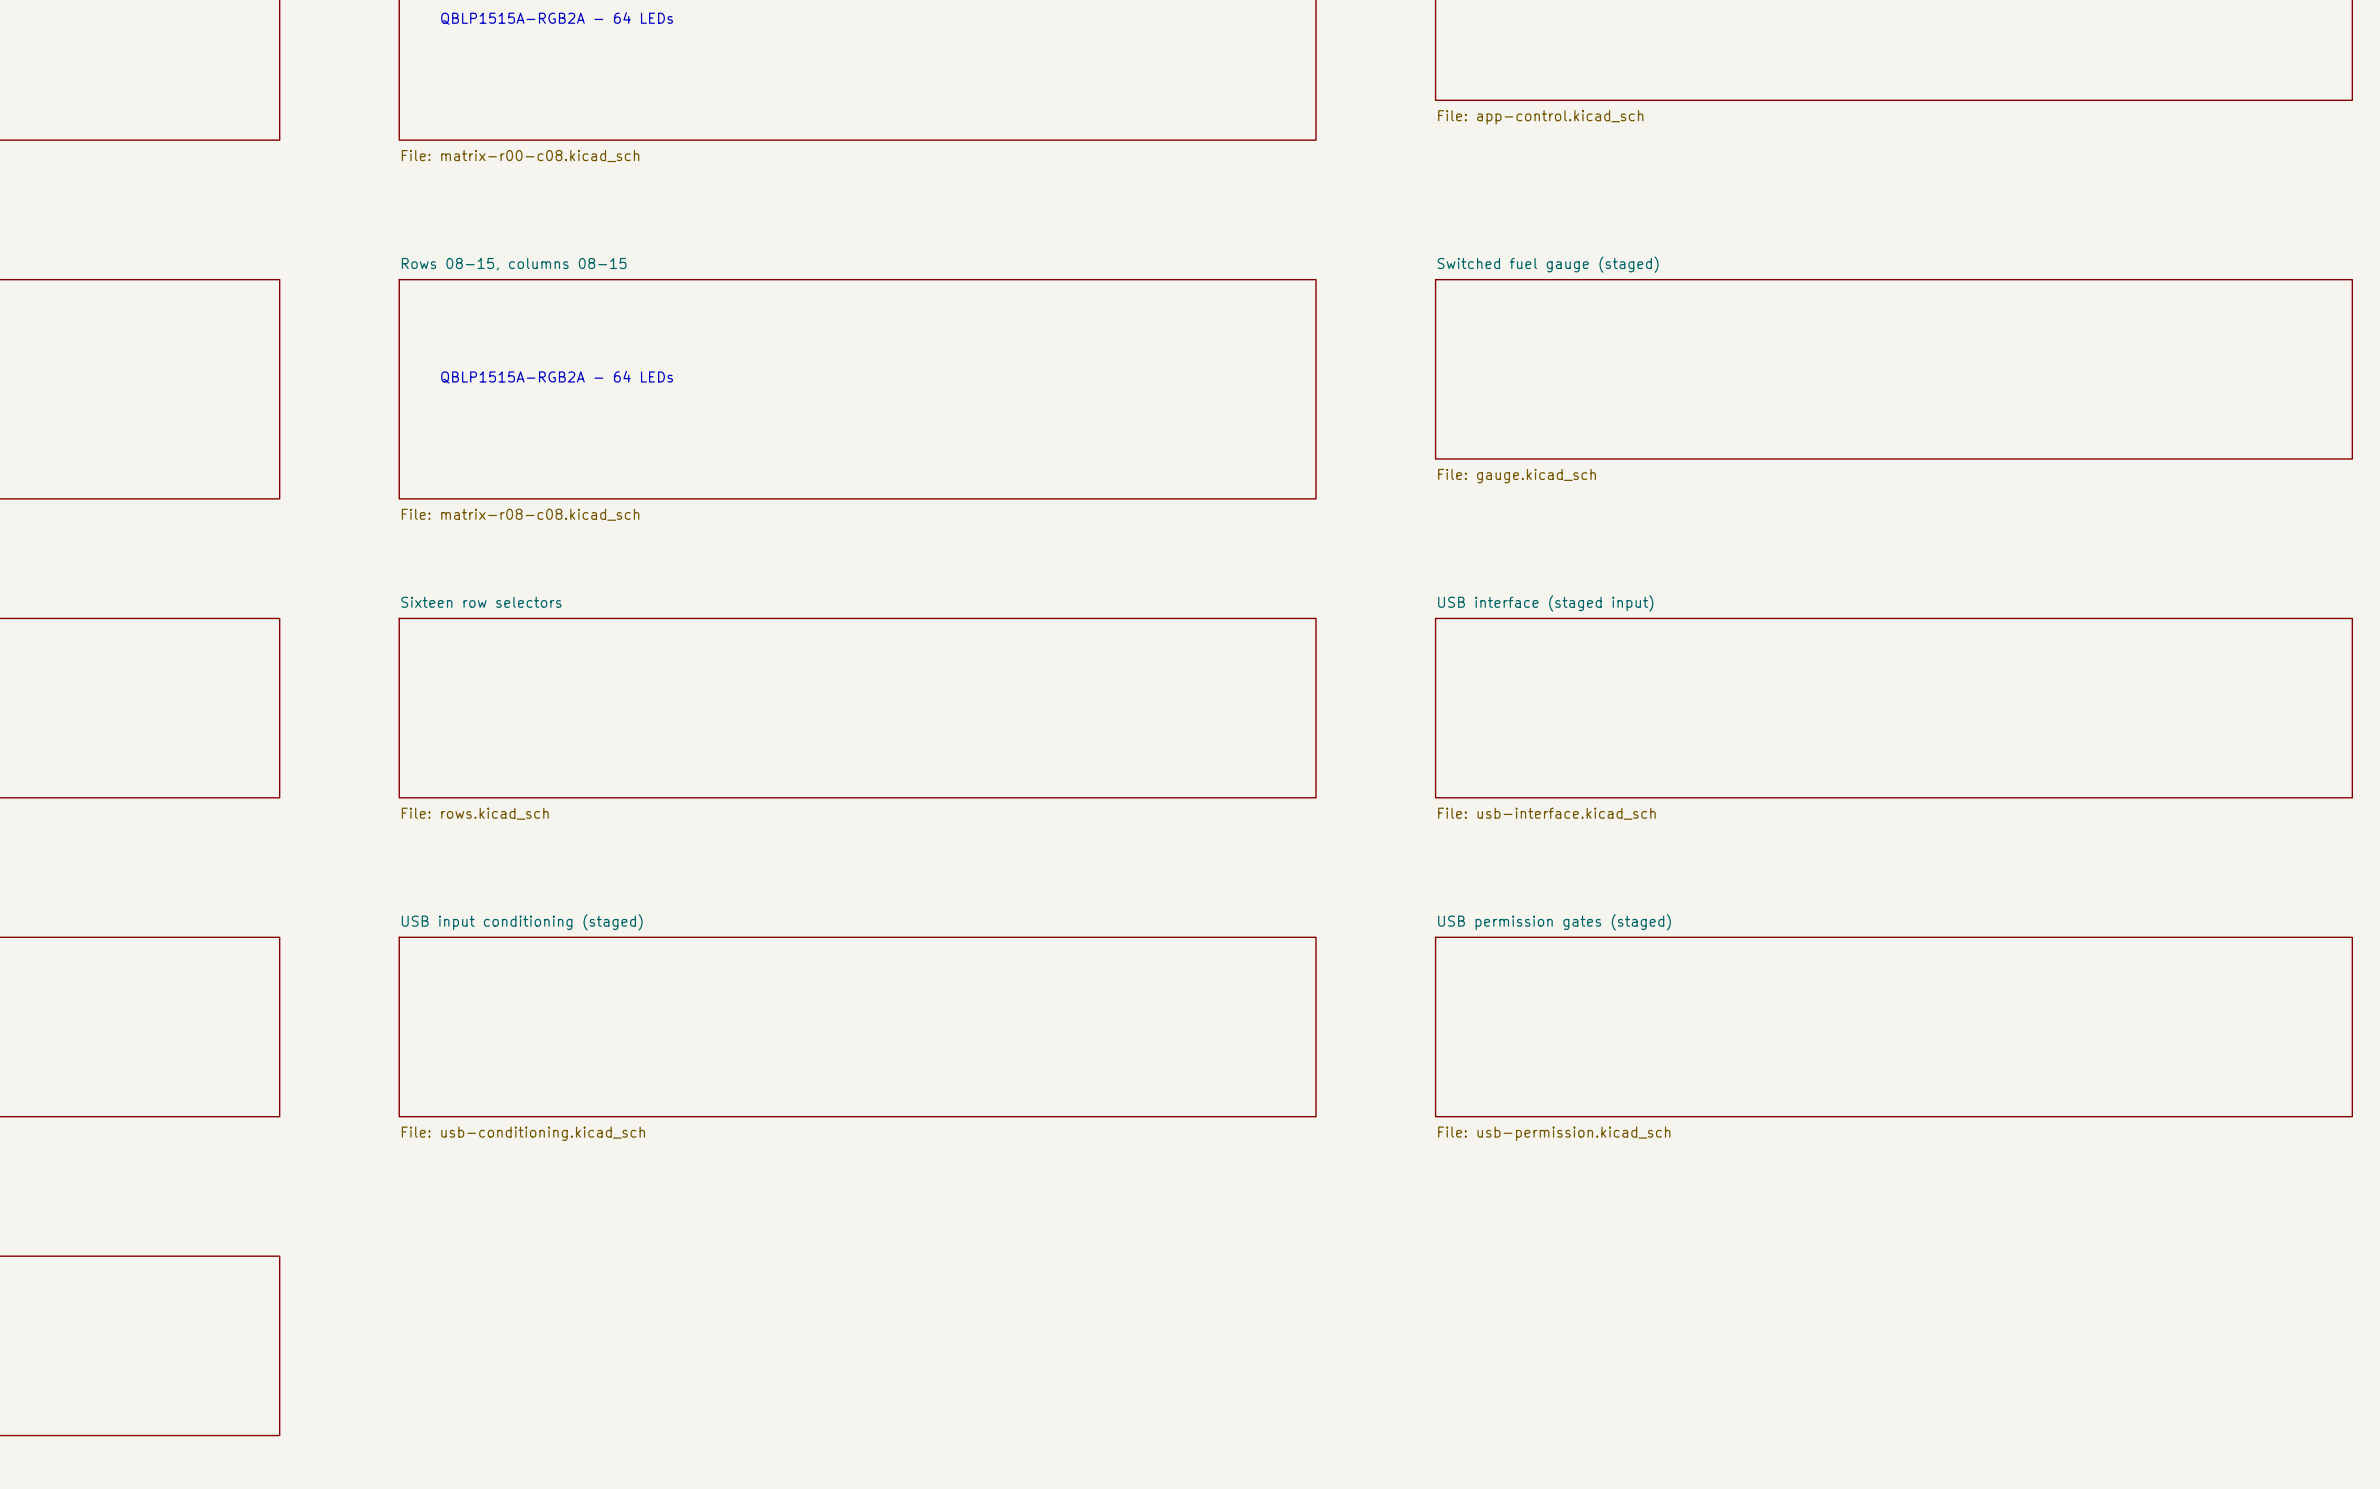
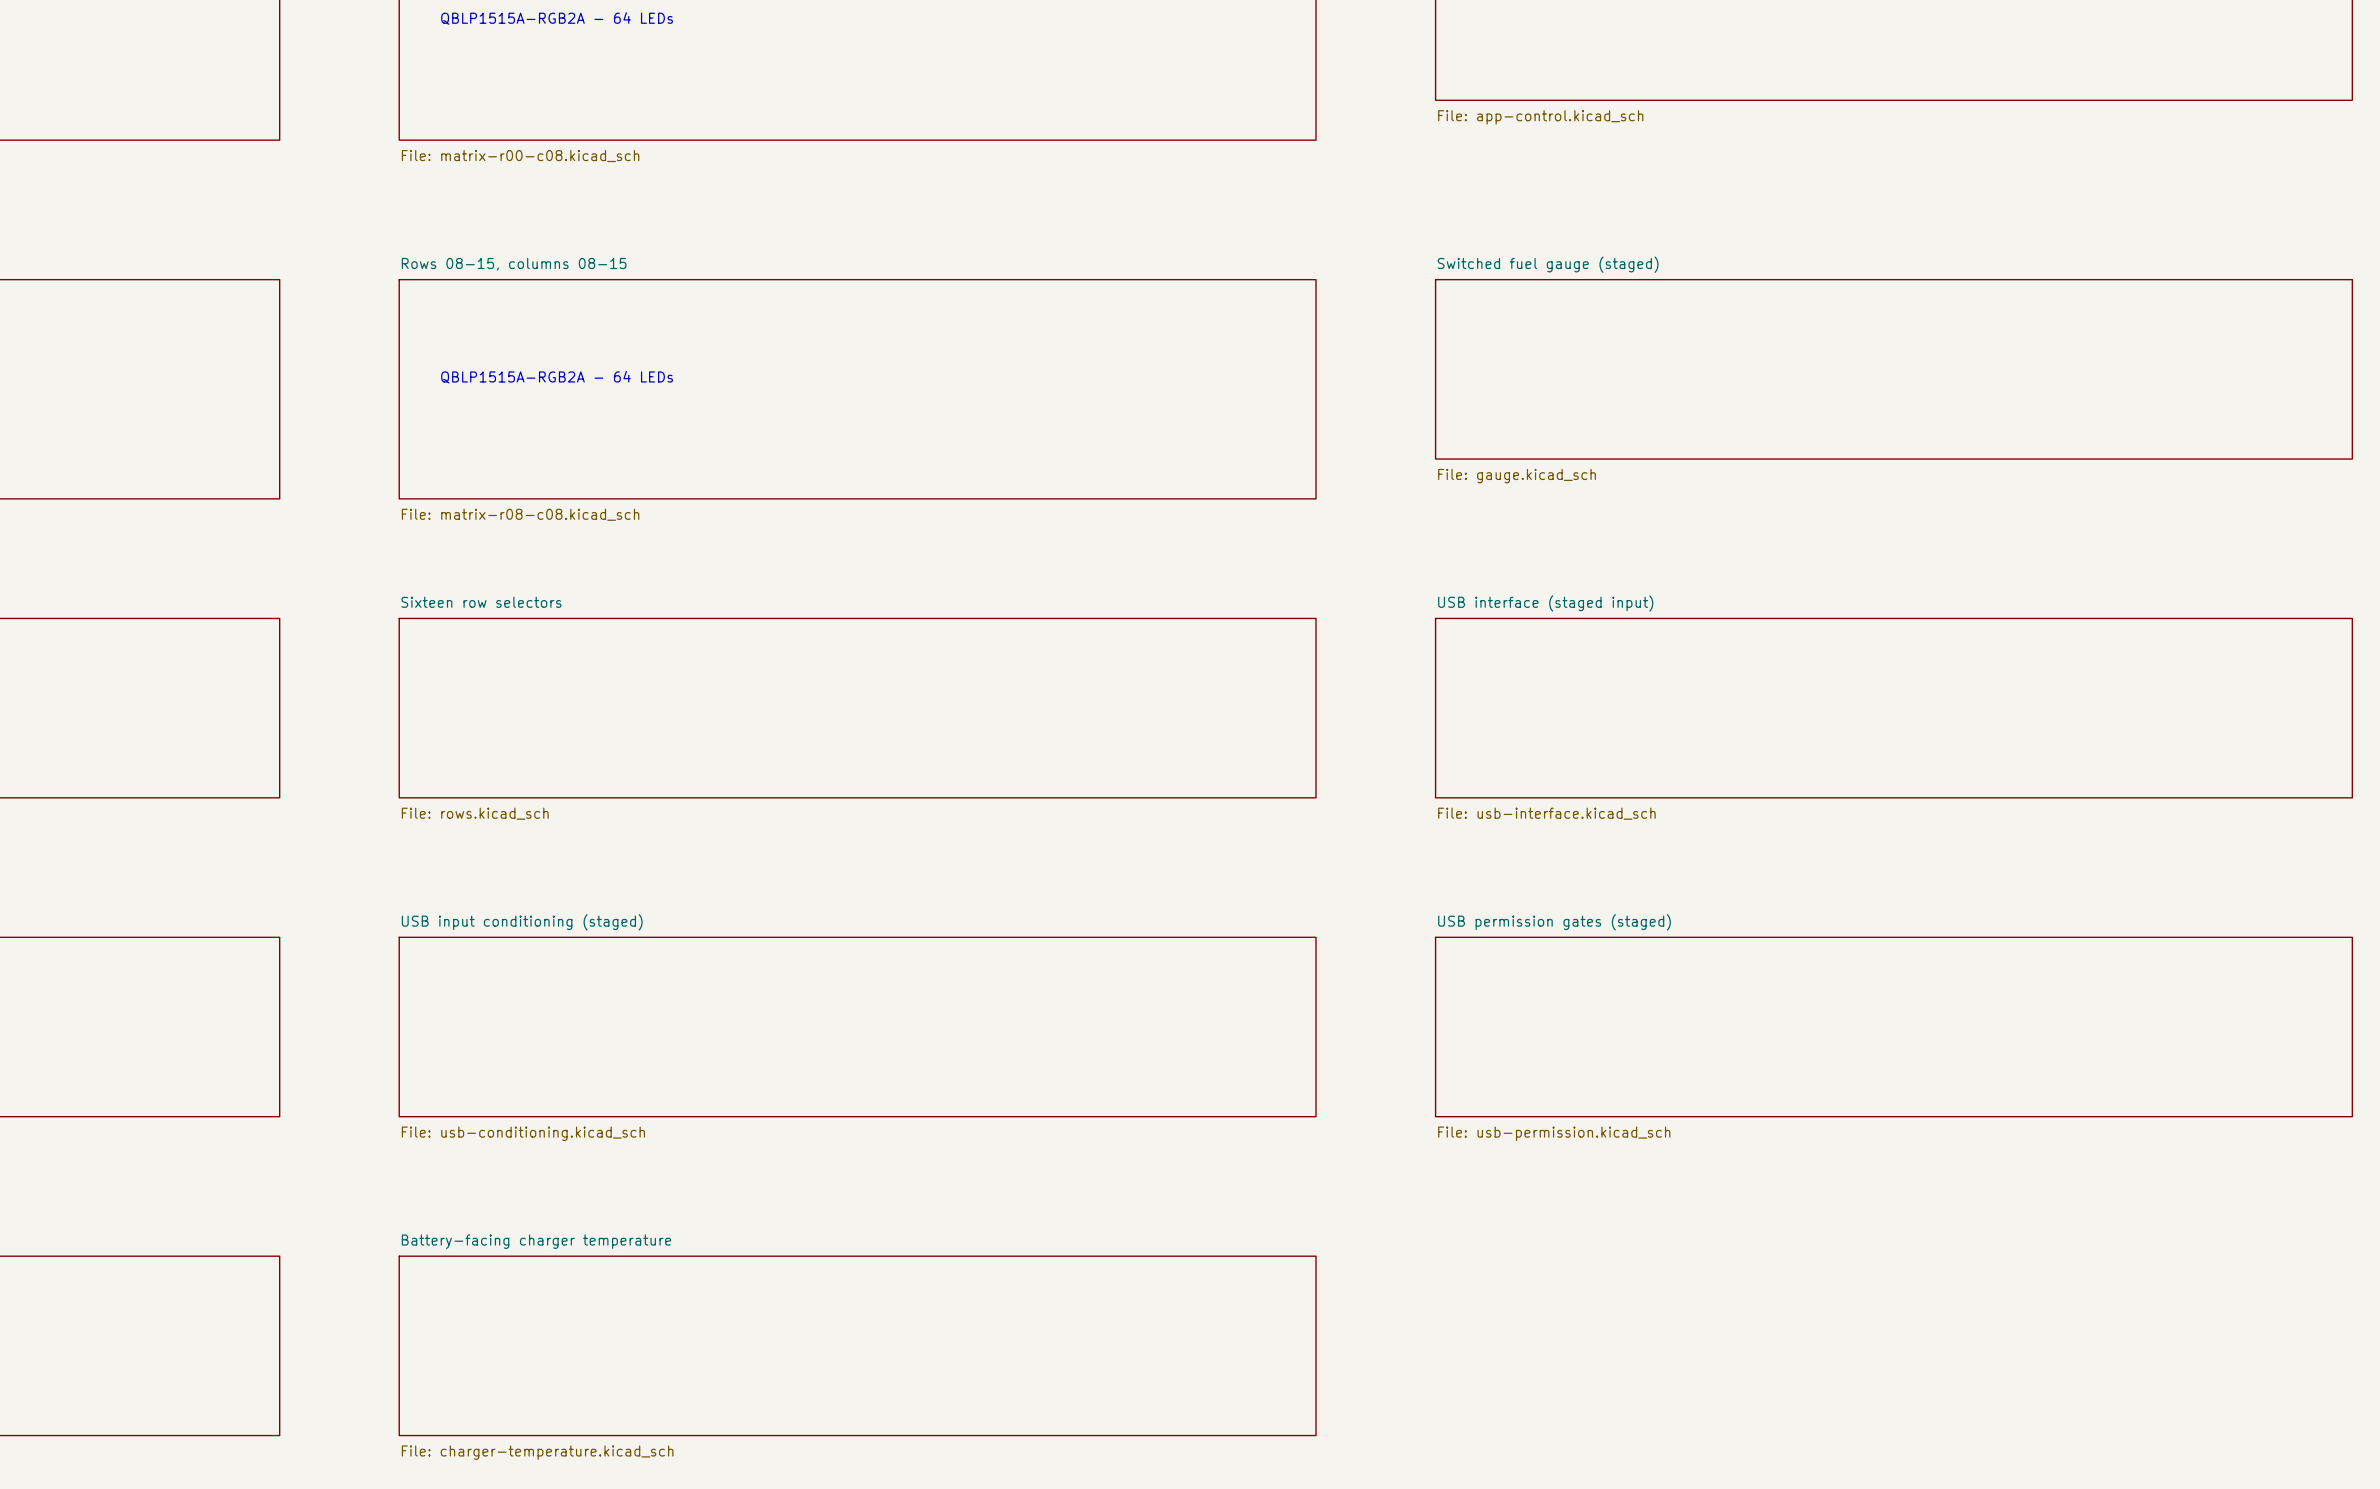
sheet Battery-facing charger temperature: none -> File: charger-temperature.kicad_sch (857, 1345)

